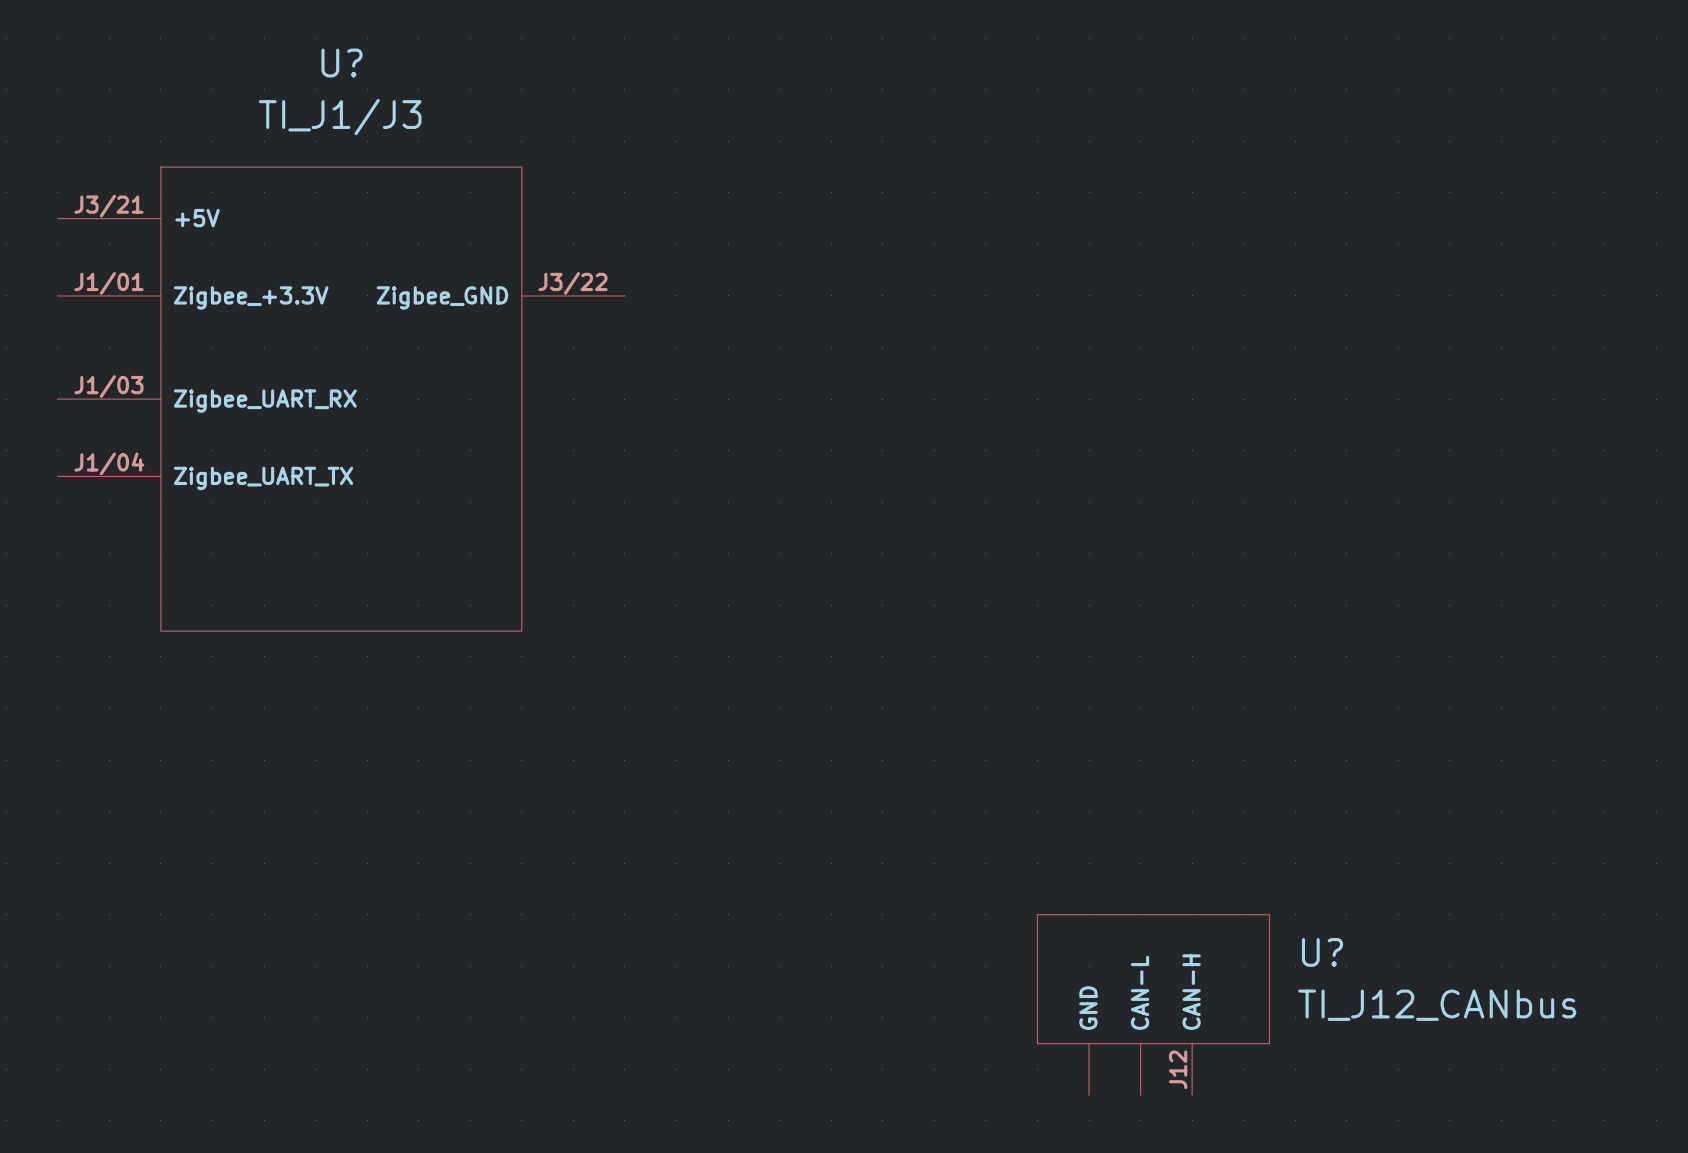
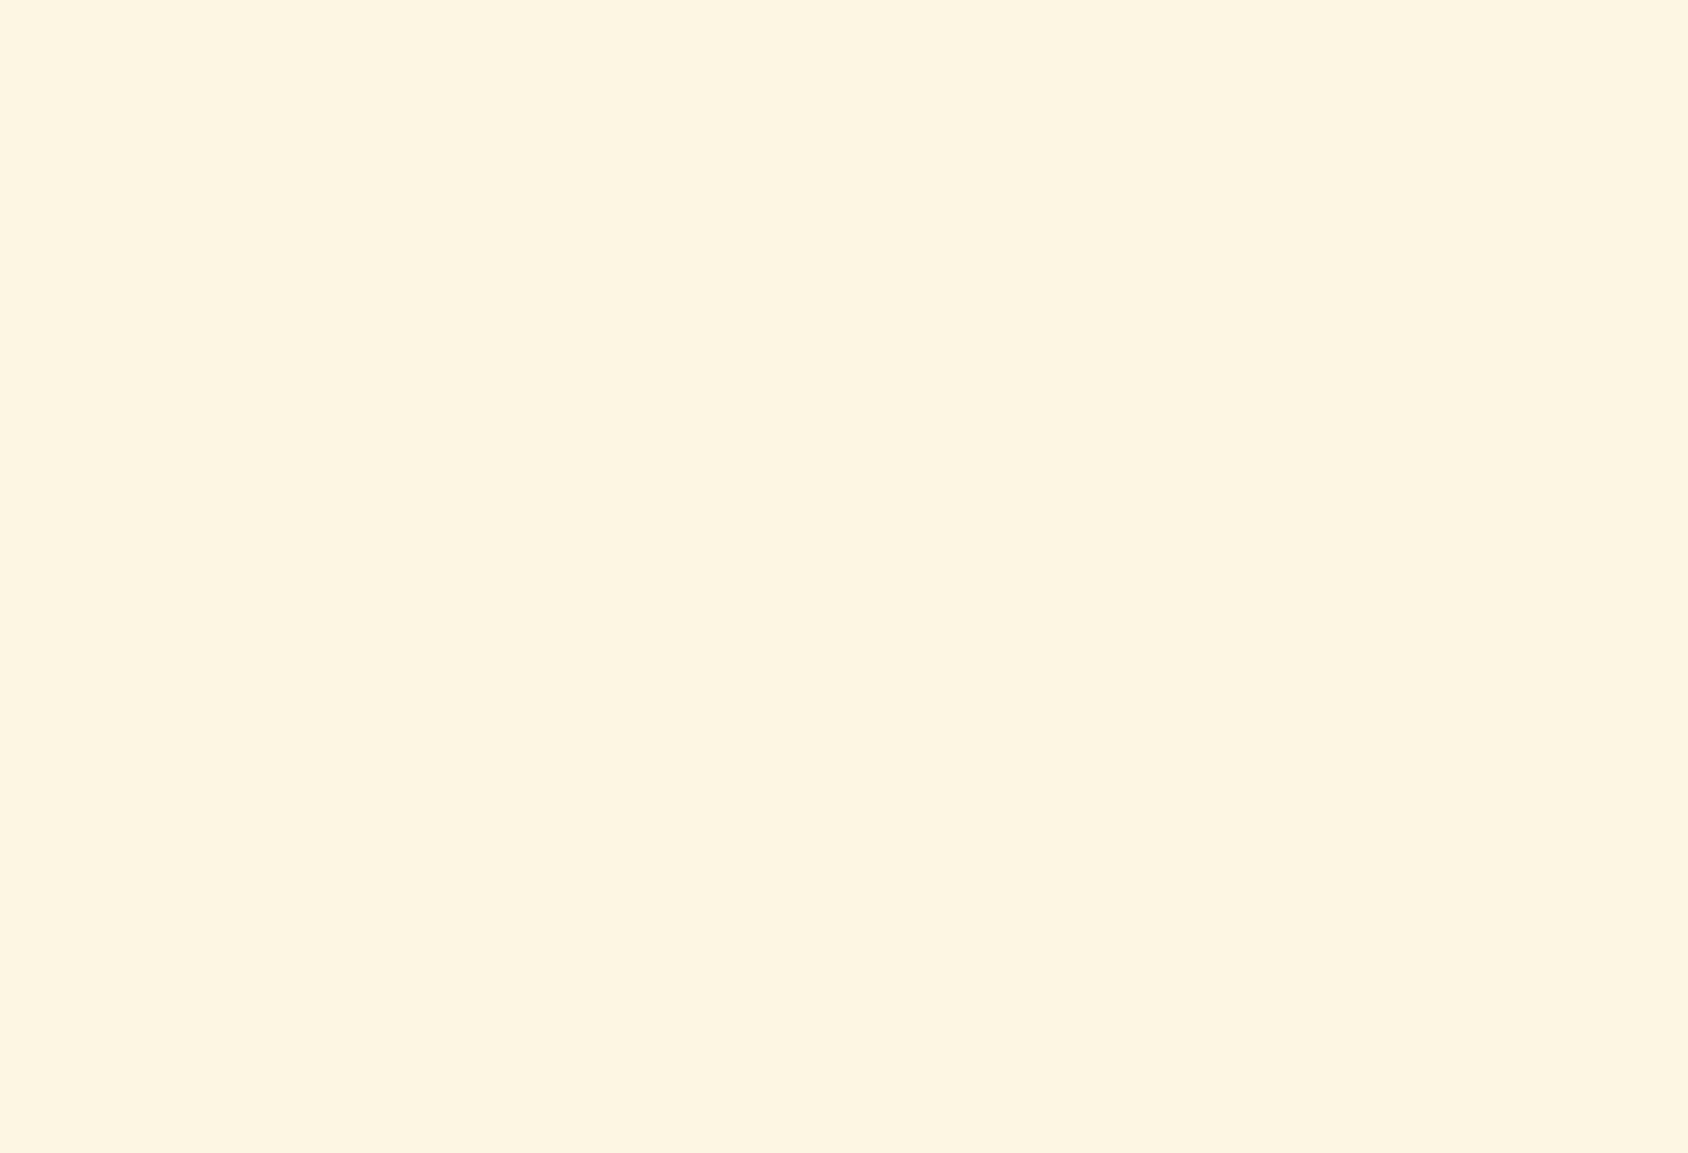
U?: TI_J1/J3 (341, 399) -> none
U?: TI_J12_CANbus (1153, 1004) -> none

